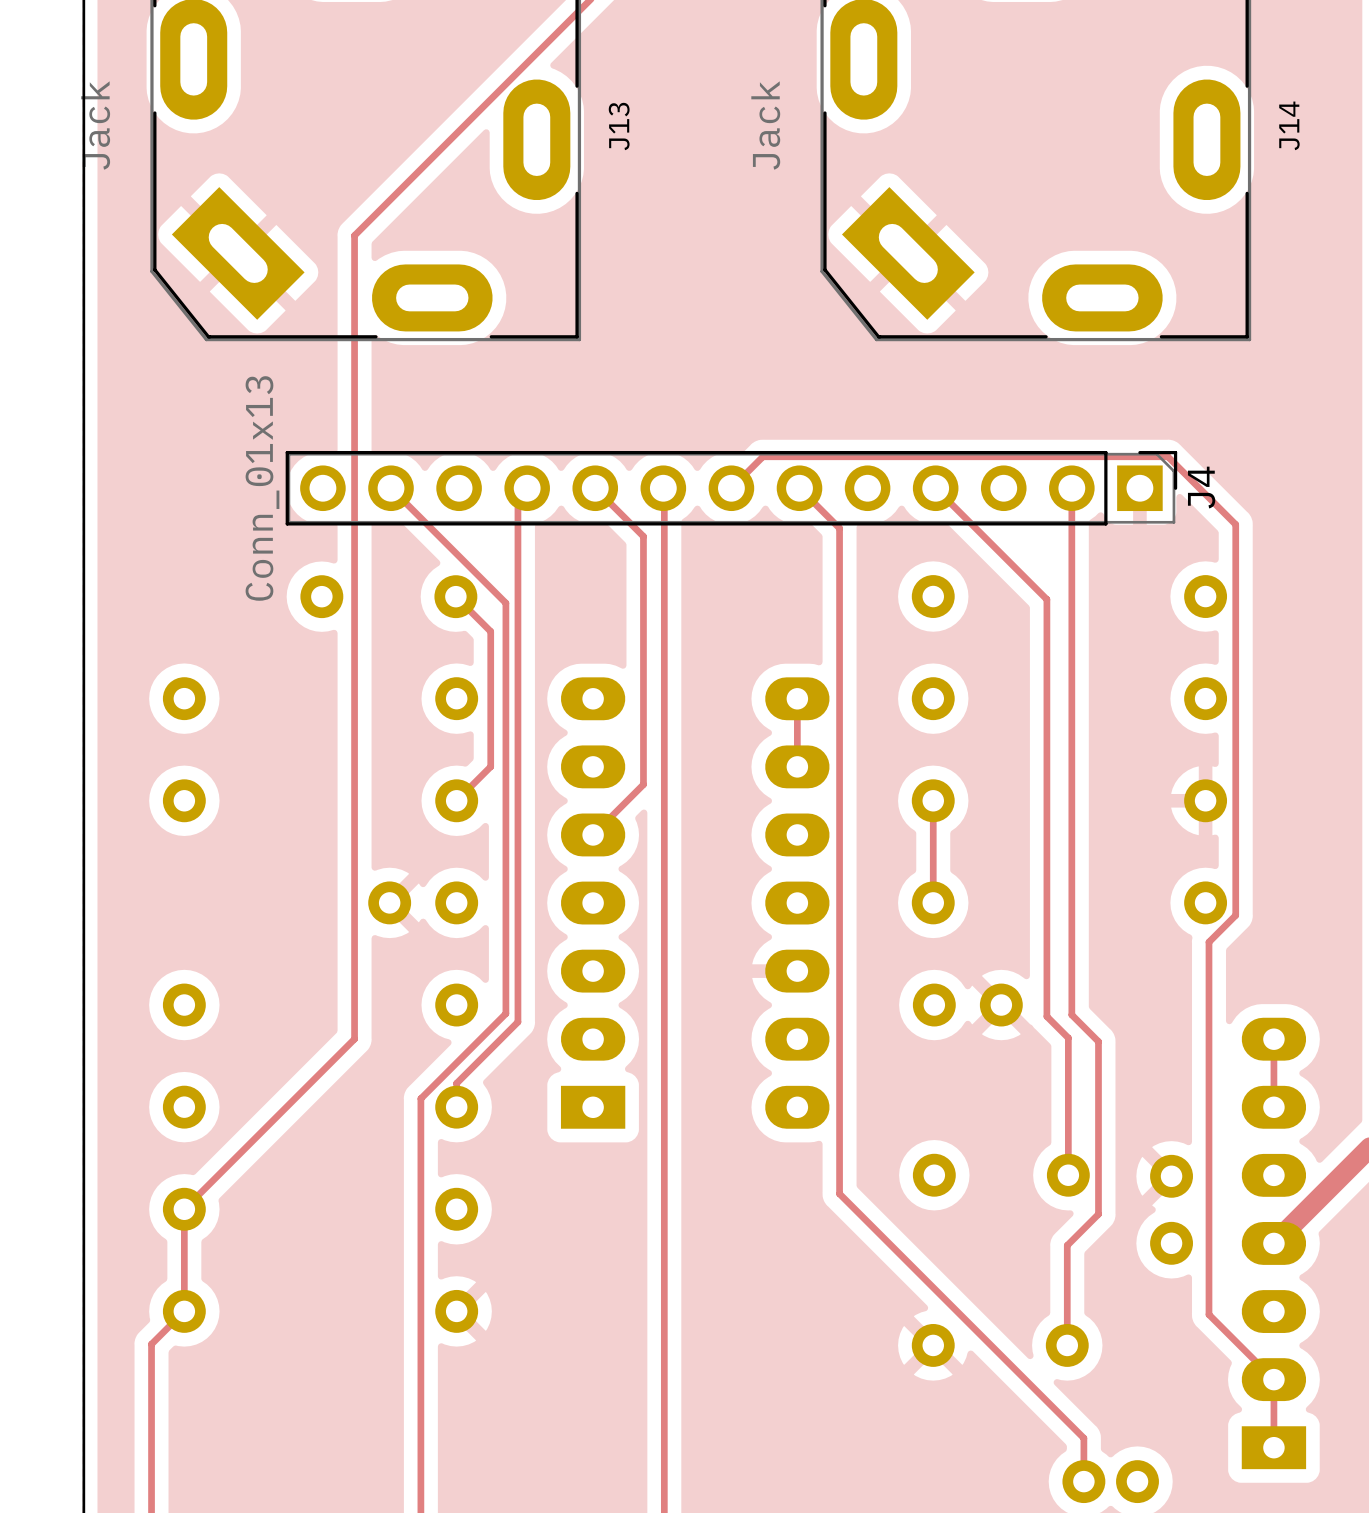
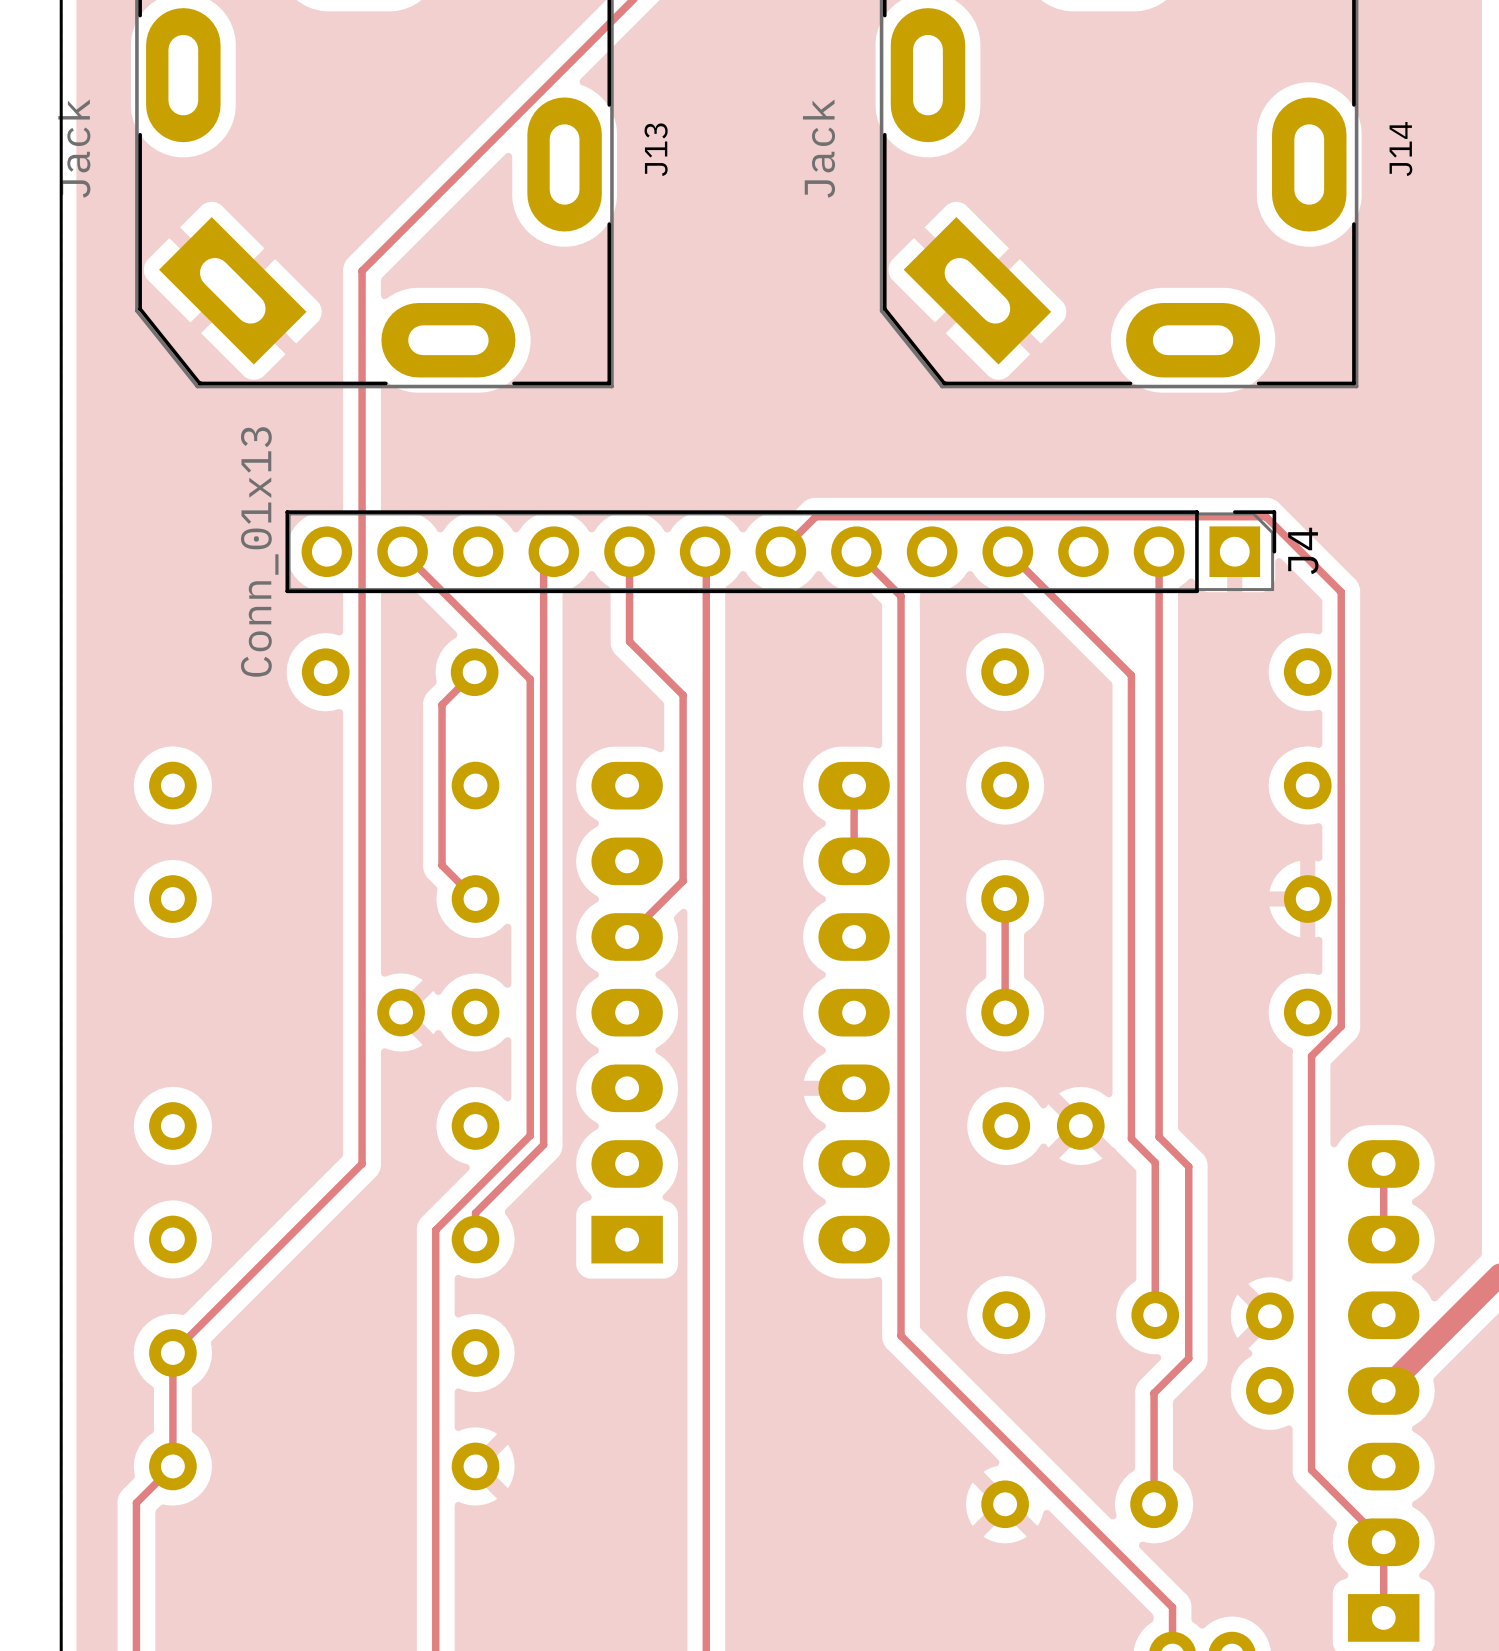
track: (595, 488) (643, 536) (643, 617) -> (629, 551) (629, 641) (683, 695)
track: (455, 596) (490, 631) (490, 766) (456, 800) -> (474, 672) (442, 704) (442, 865) (475, 899)

